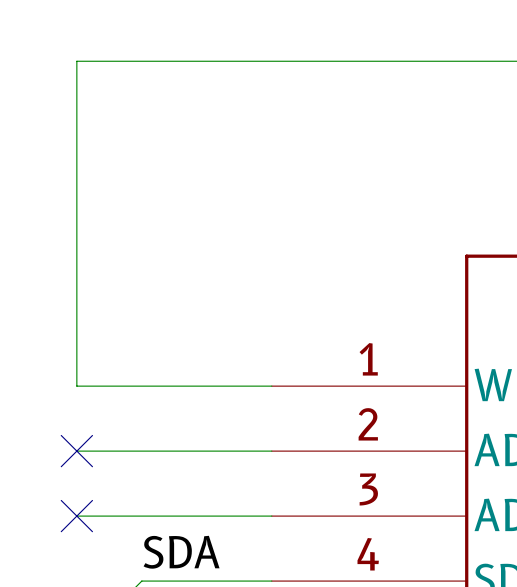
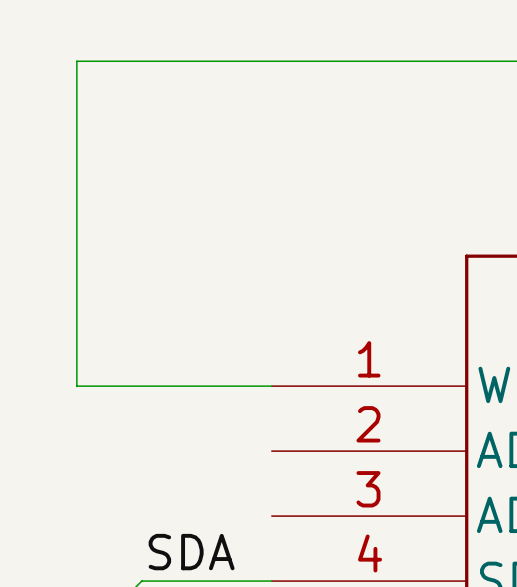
wire: (76, 451) (271, 451) -> none
no-connect mark: (76, 451) -> none
wire: (76, 516) (271, 516) -> none
no-connect mark: (76, 516) -> none

